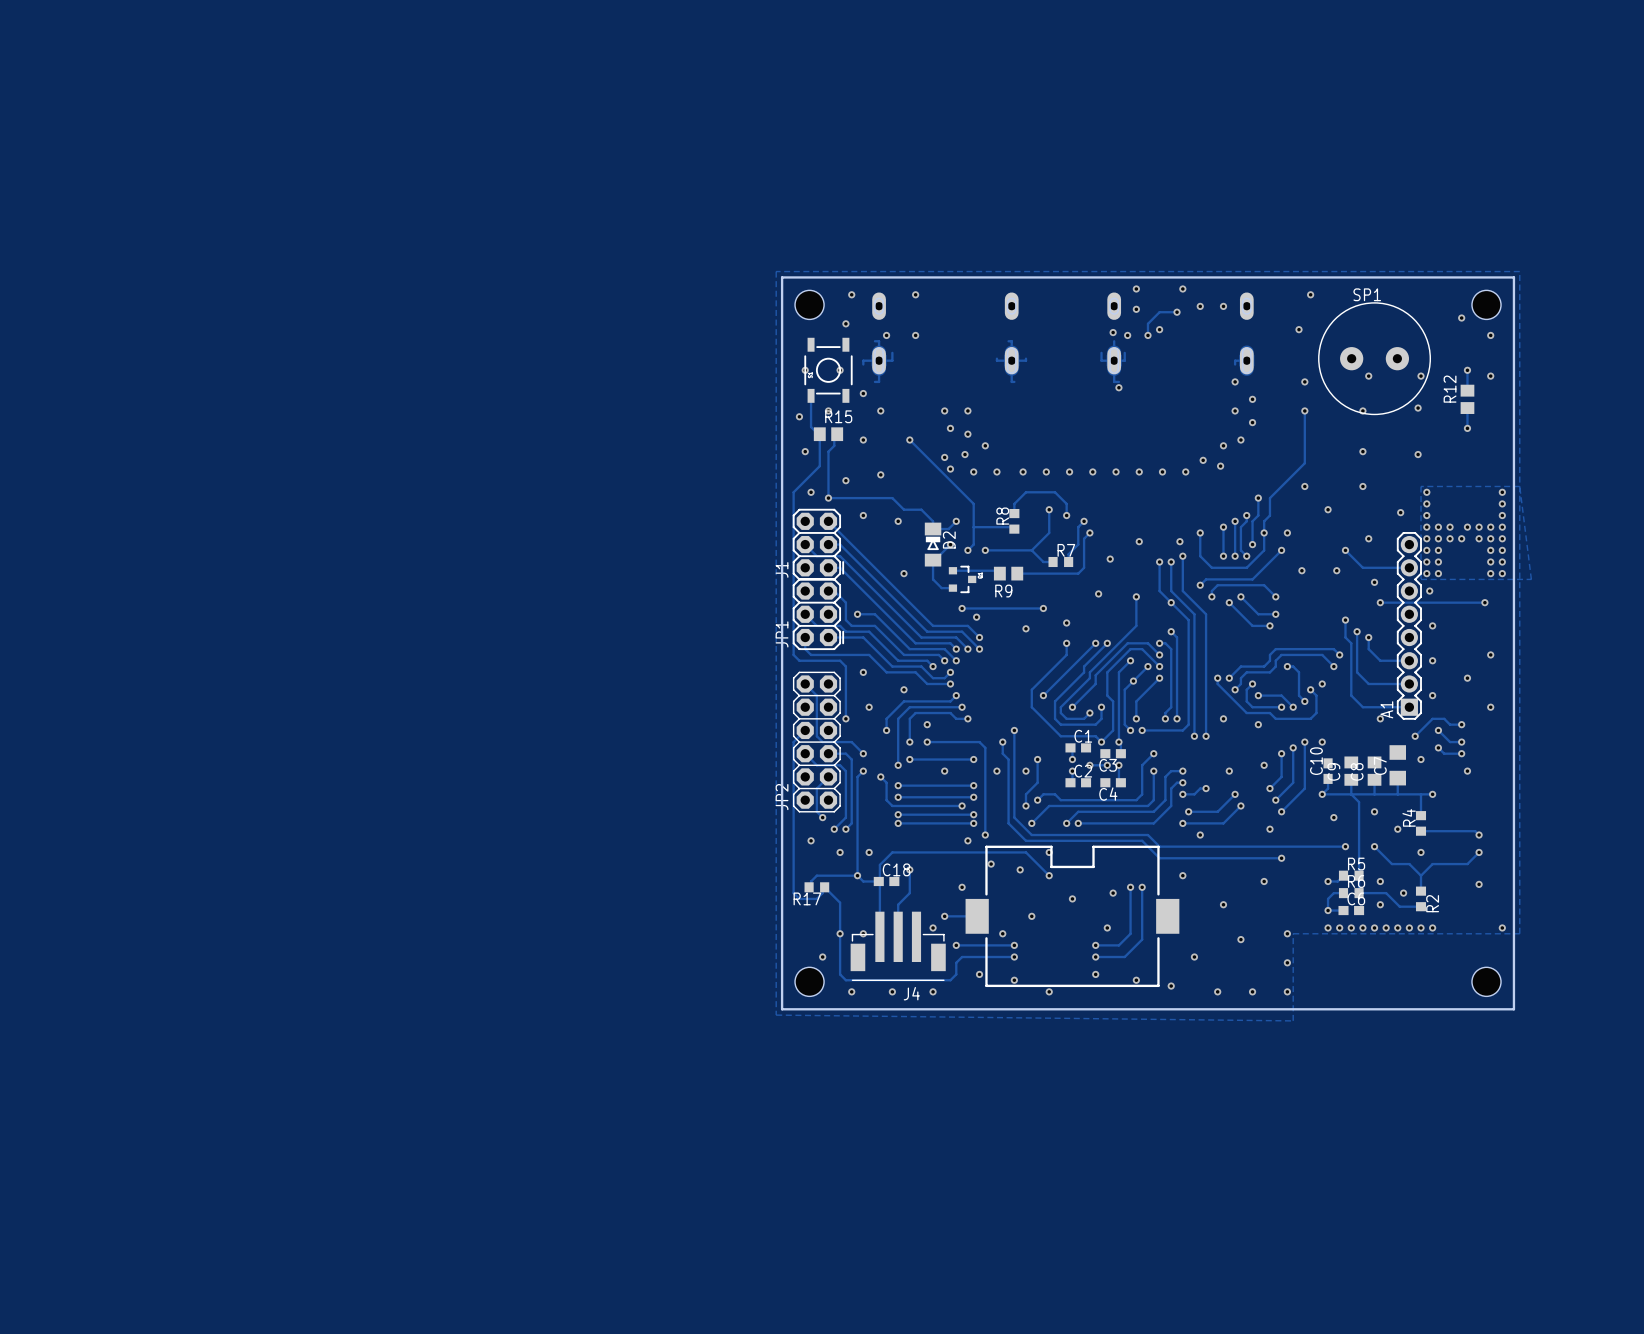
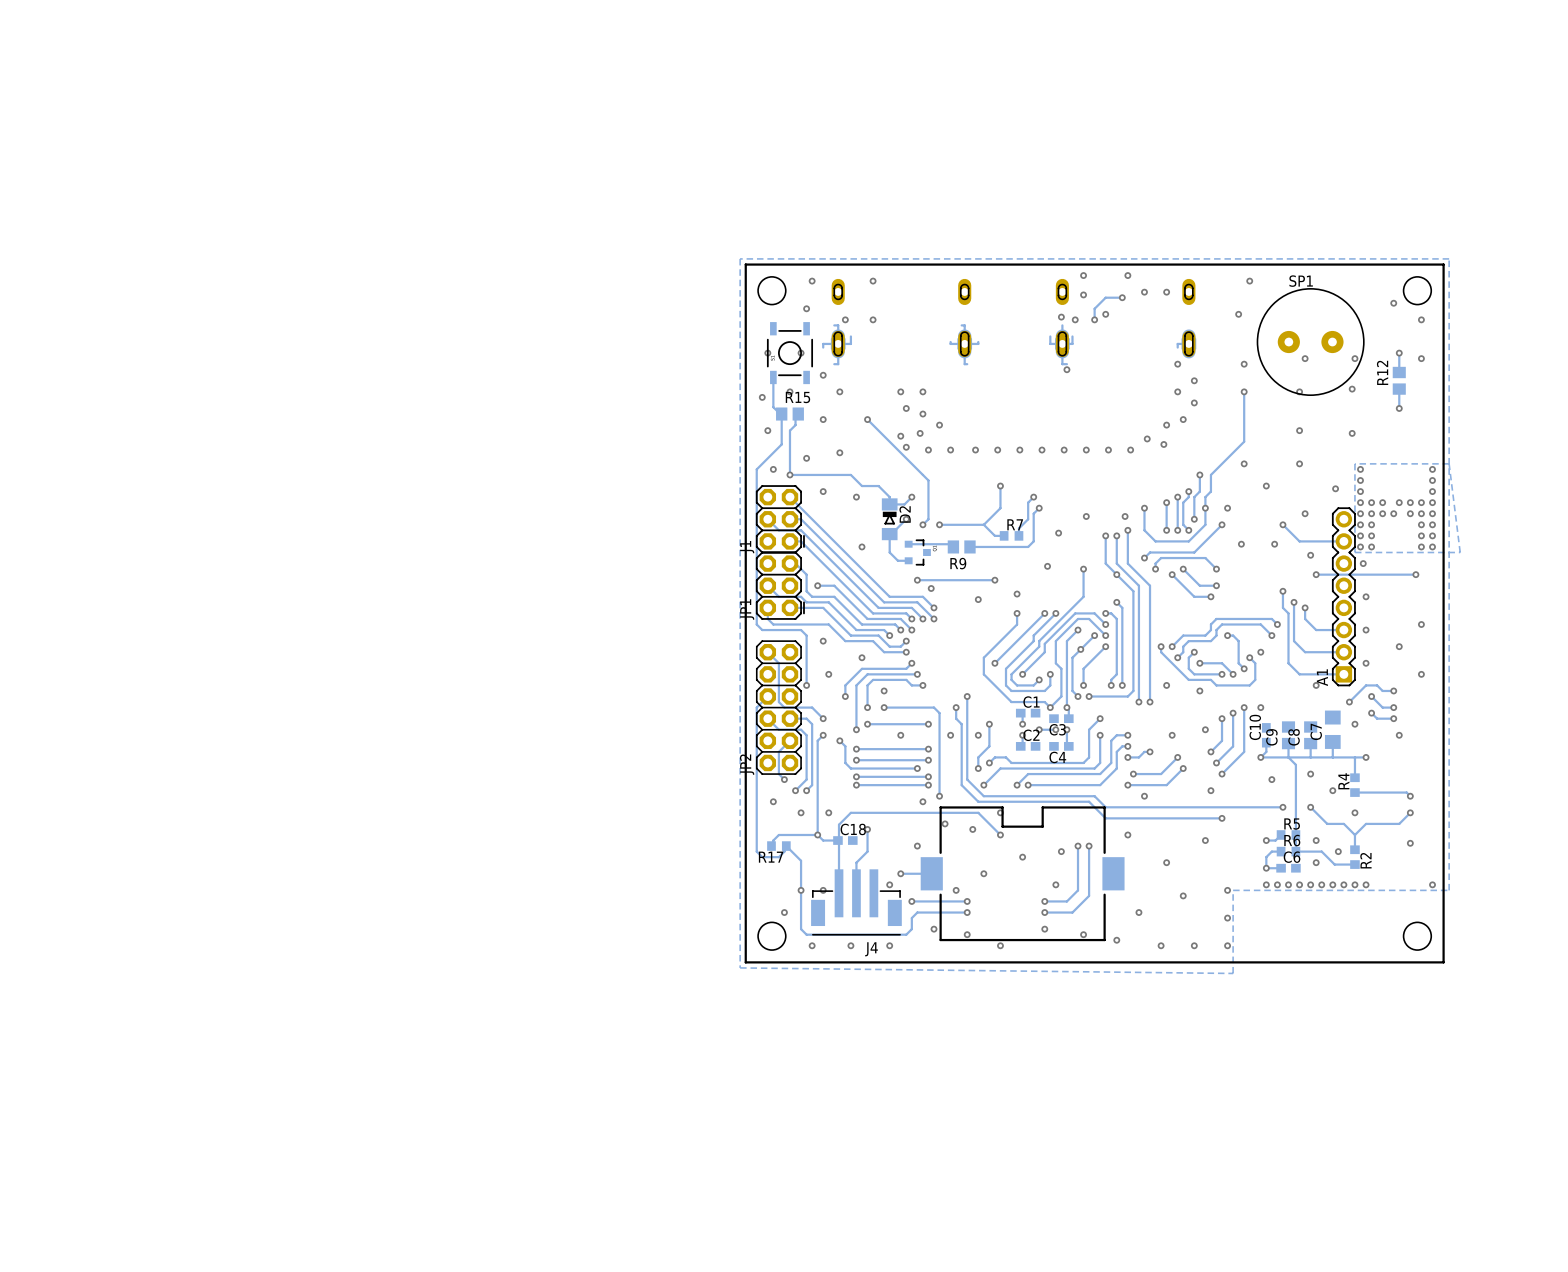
track: (1014, 513) (1014, 503) (1025, 492) (1055, 492) (1066, 503) (1066, 515) -> none
via: (1066, 515) -> none
R8: (1014, 521) -> none
track: (973, 527) (1012, 527) (1014, 529) -> none

